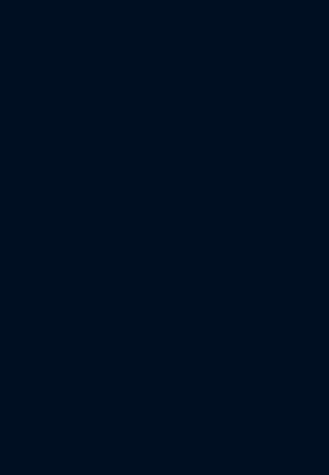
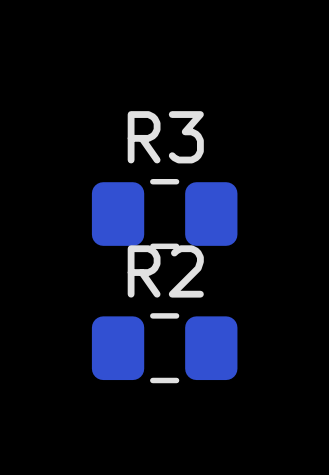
R3: none -> (164, 214)
R2: none -> (164, 348)

